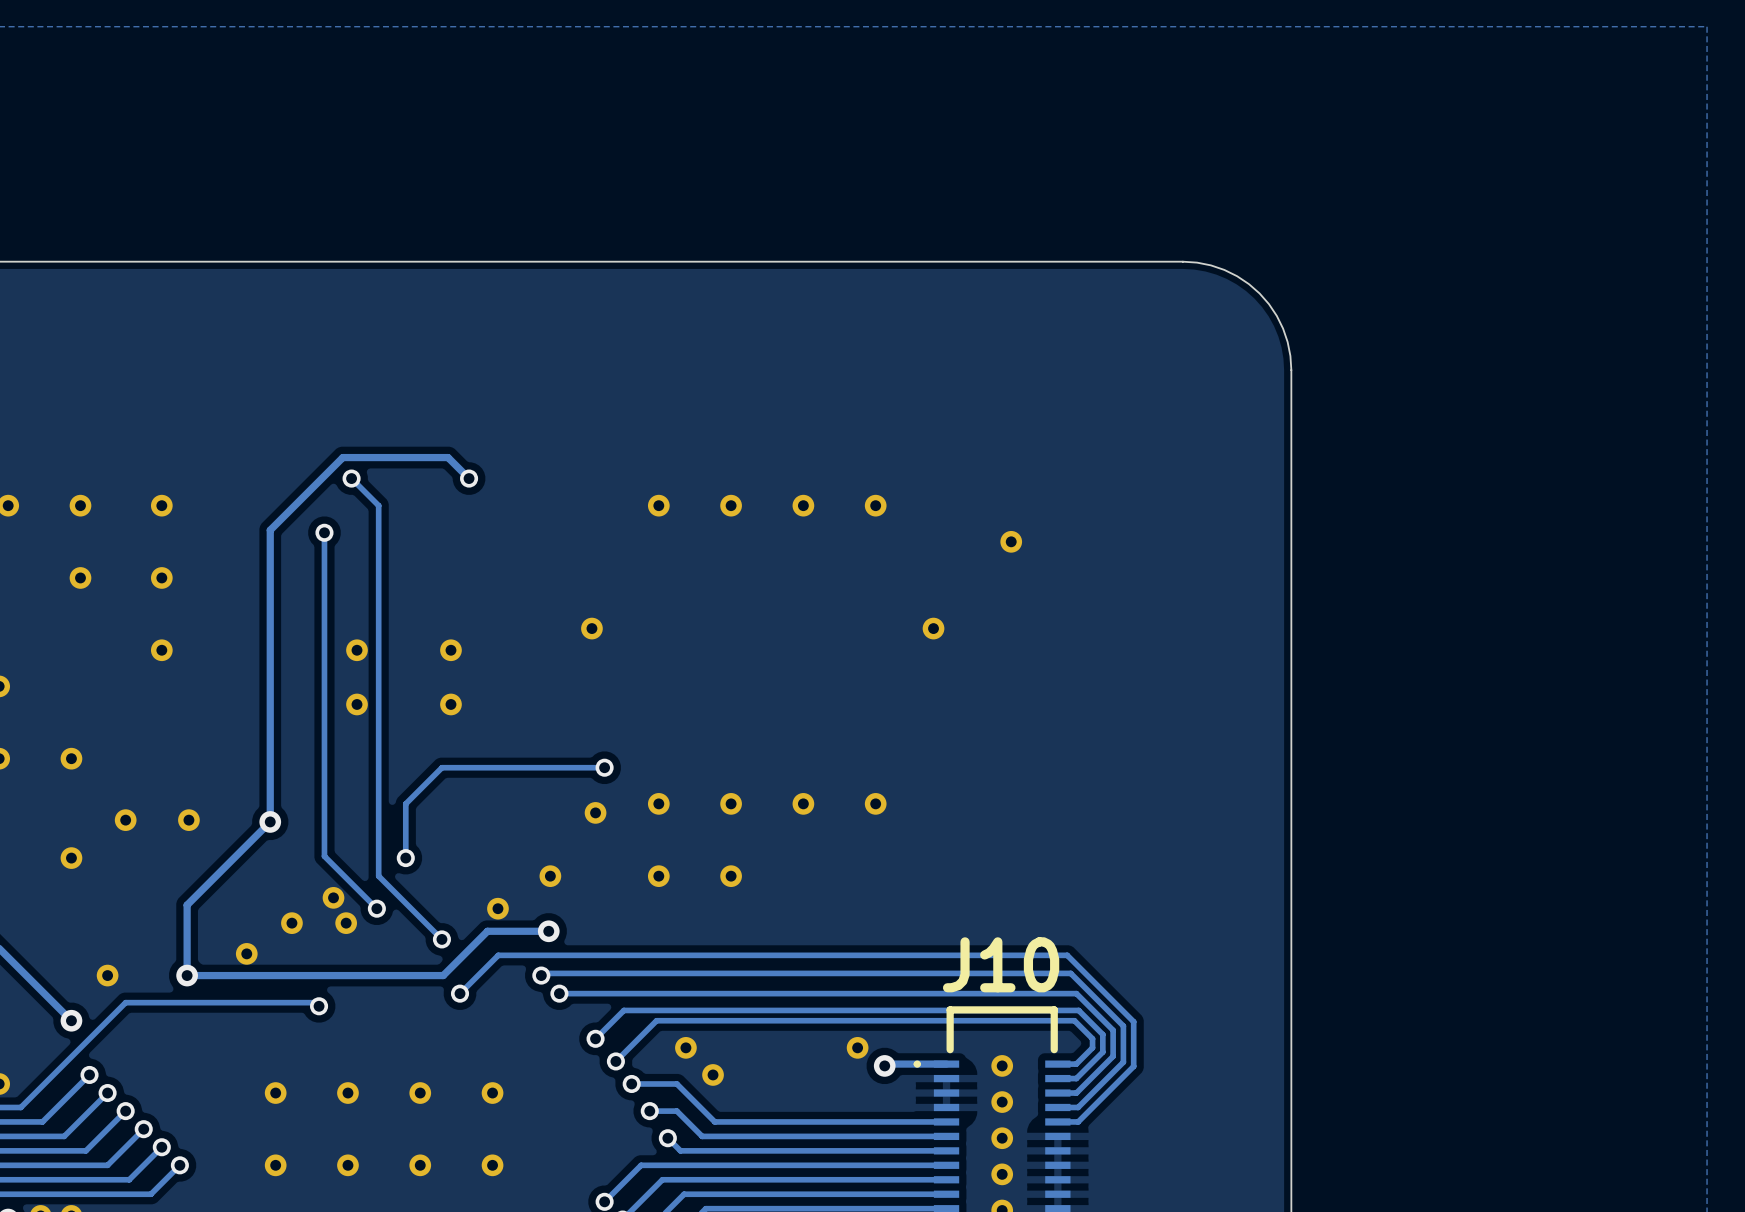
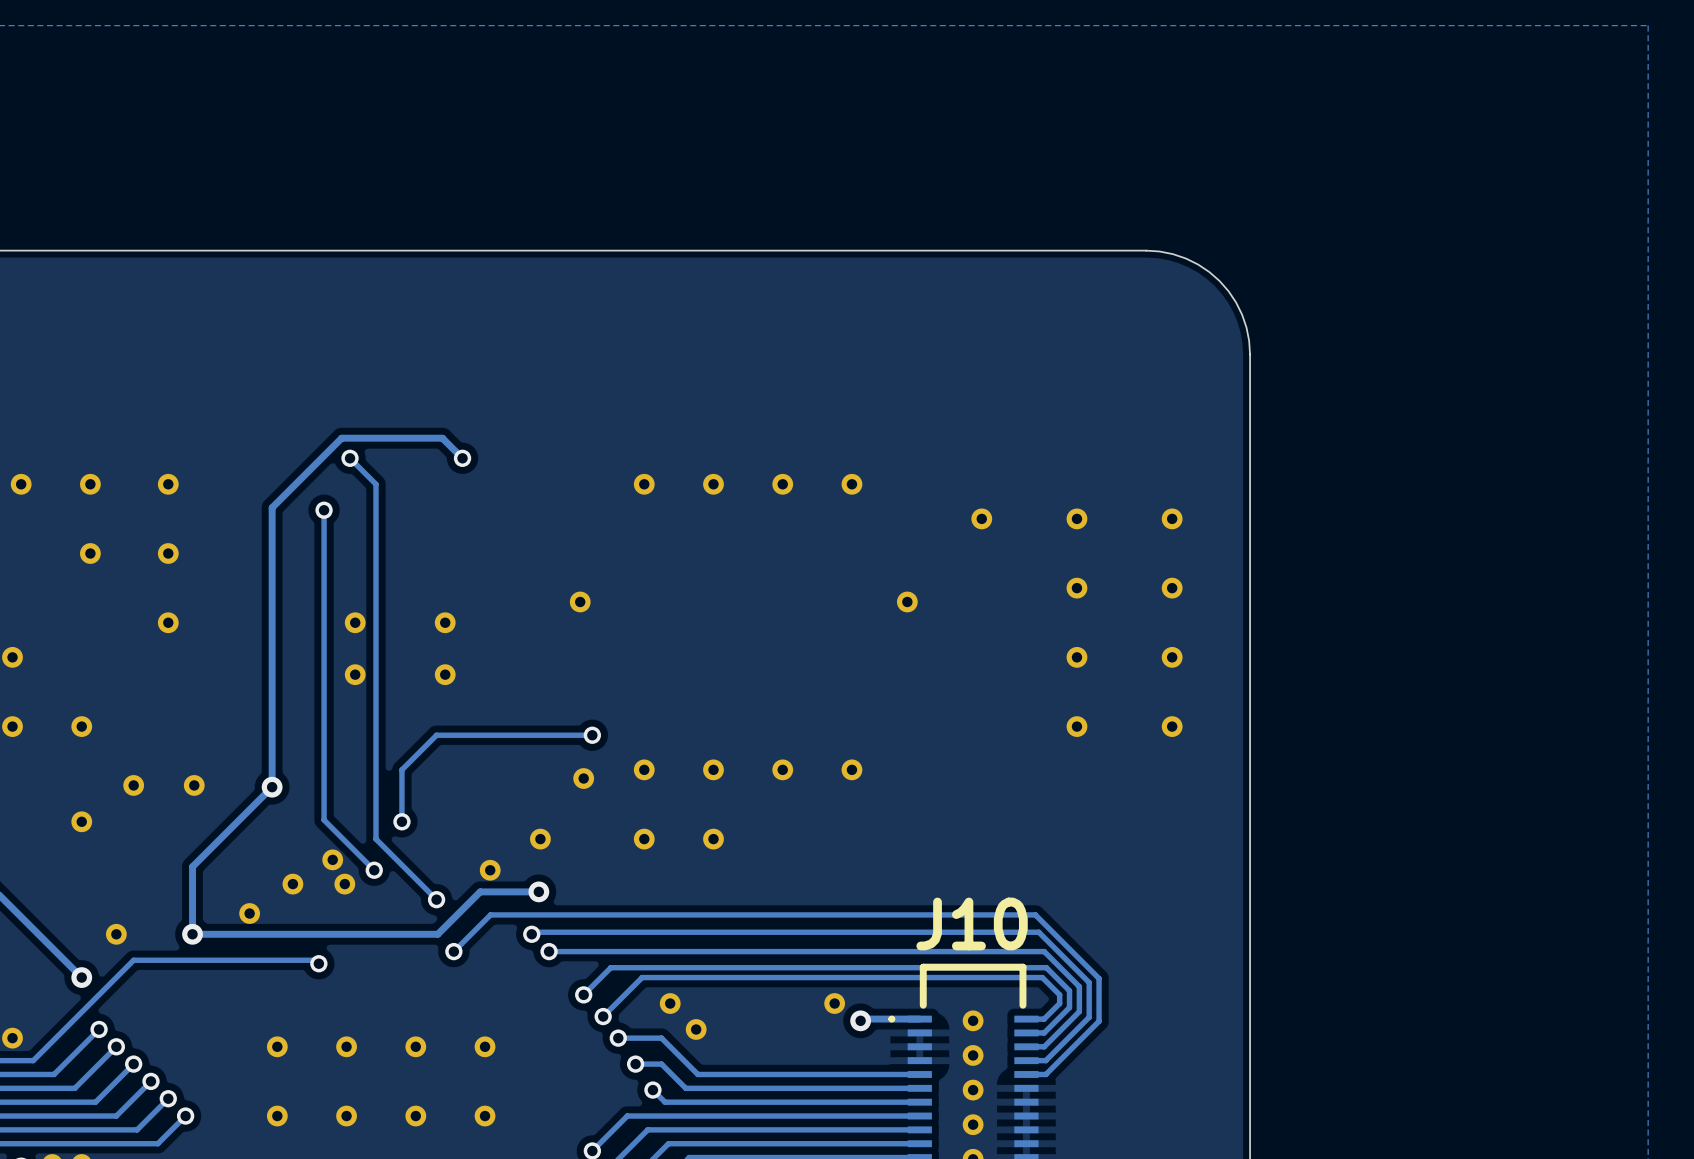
part: none -> (1076, 518)
part: none -> (1172, 518)
part: none -> (1076, 588)
part: none -> (1172, 588)
part: none -> (1076, 657)
part: none -> (1172, 657)
part: none -> (1076, 726)
part: none -> (1172, 726)

